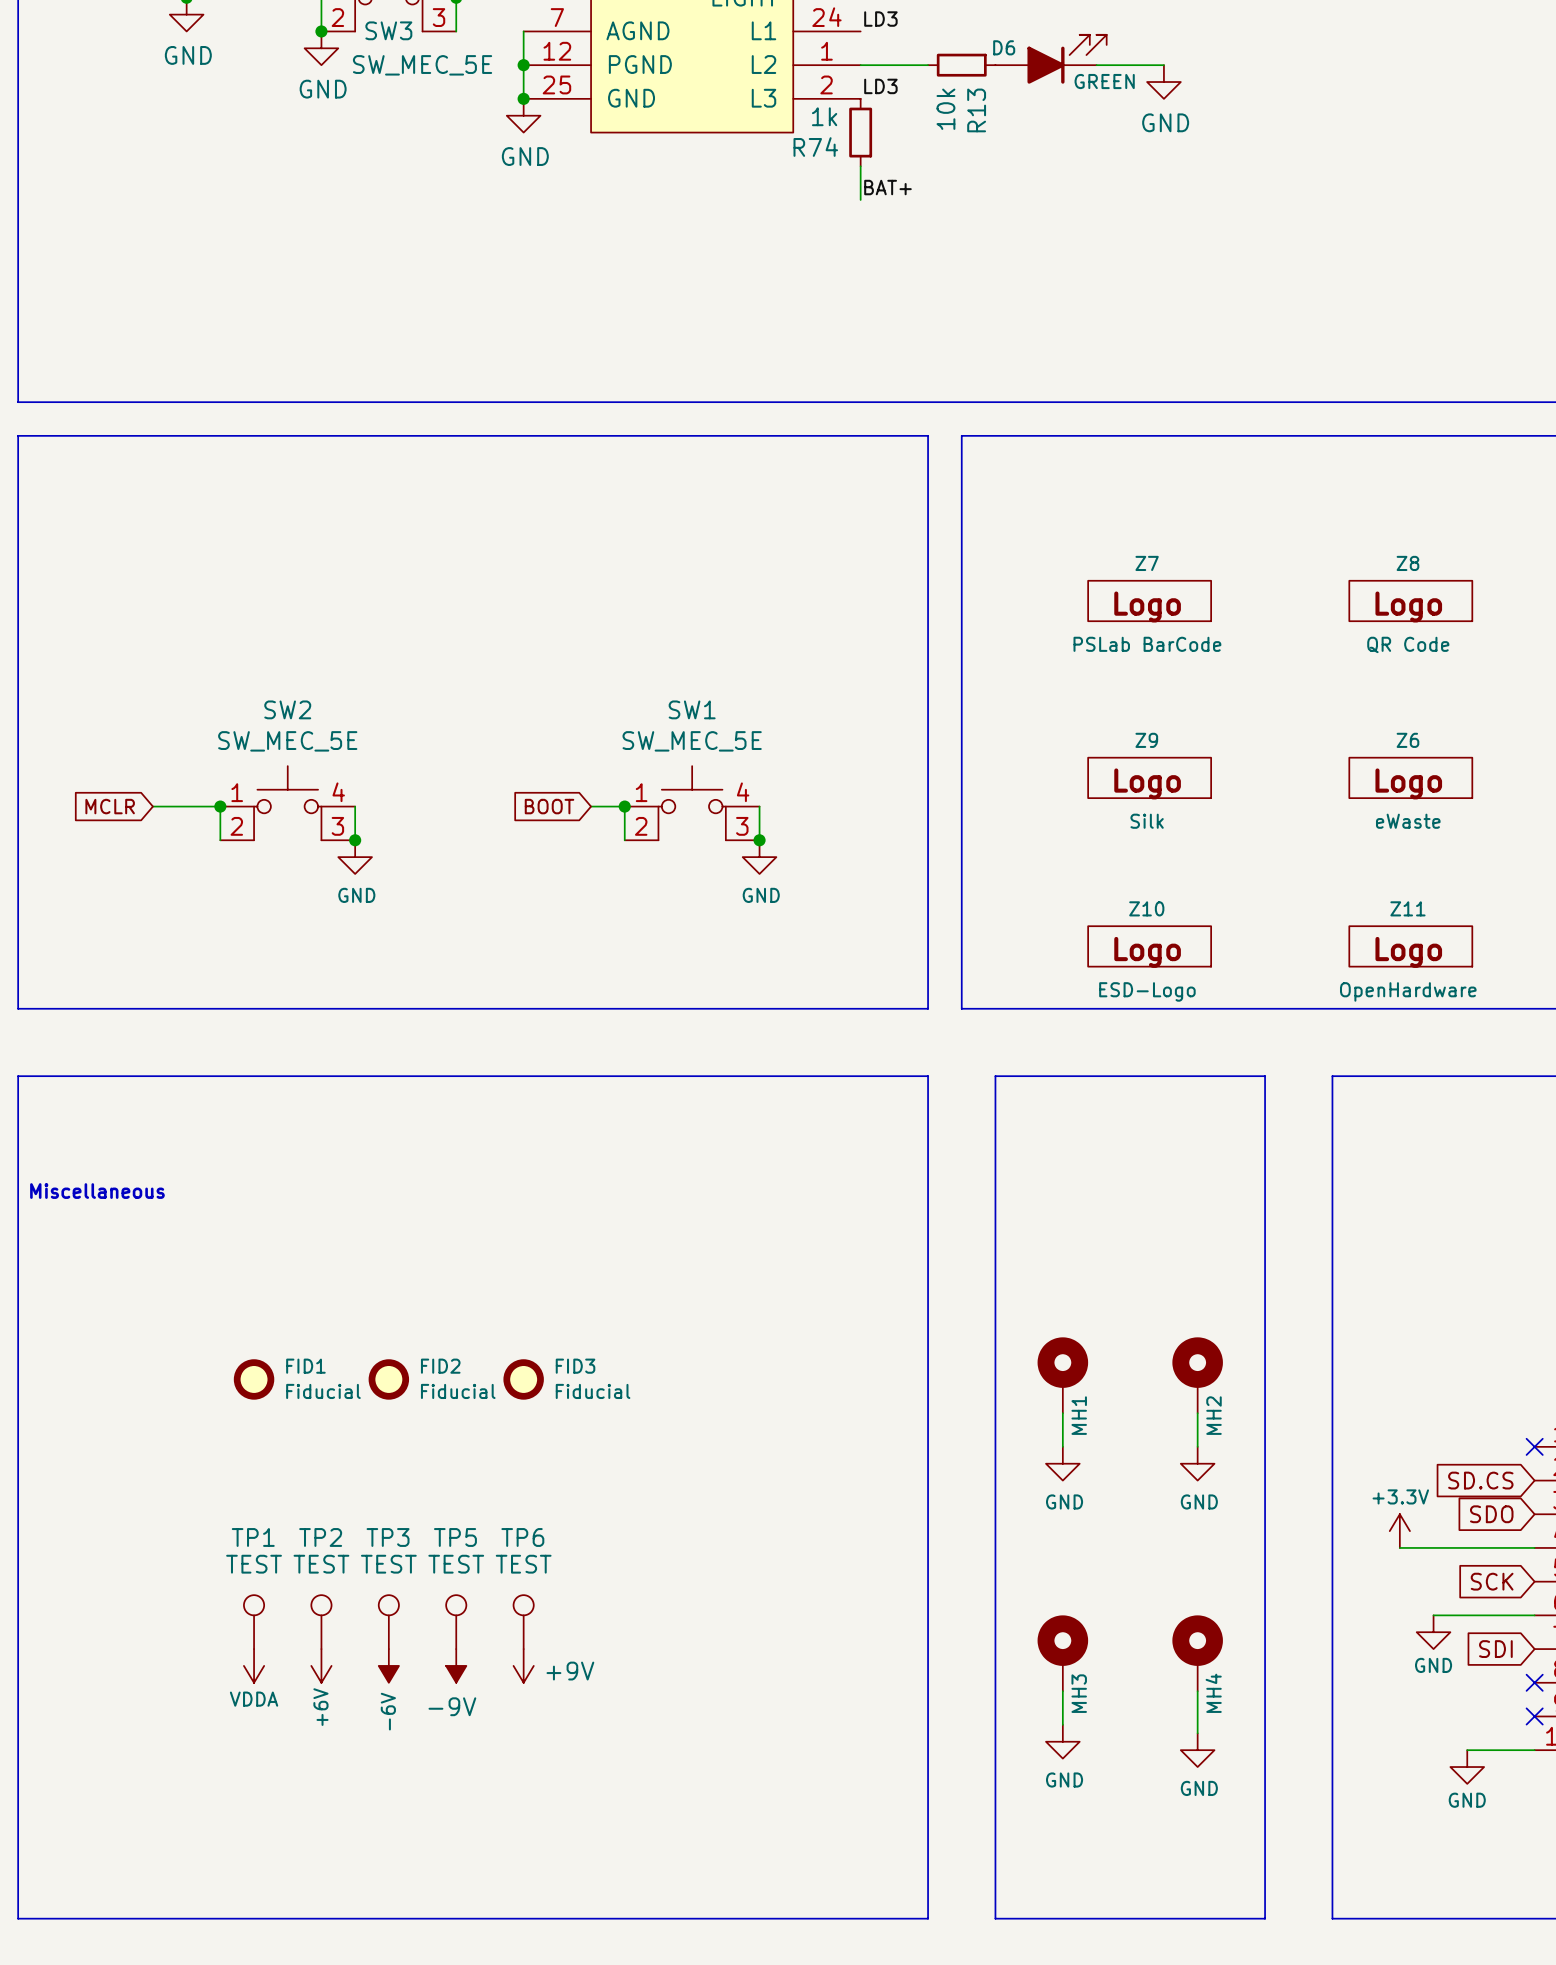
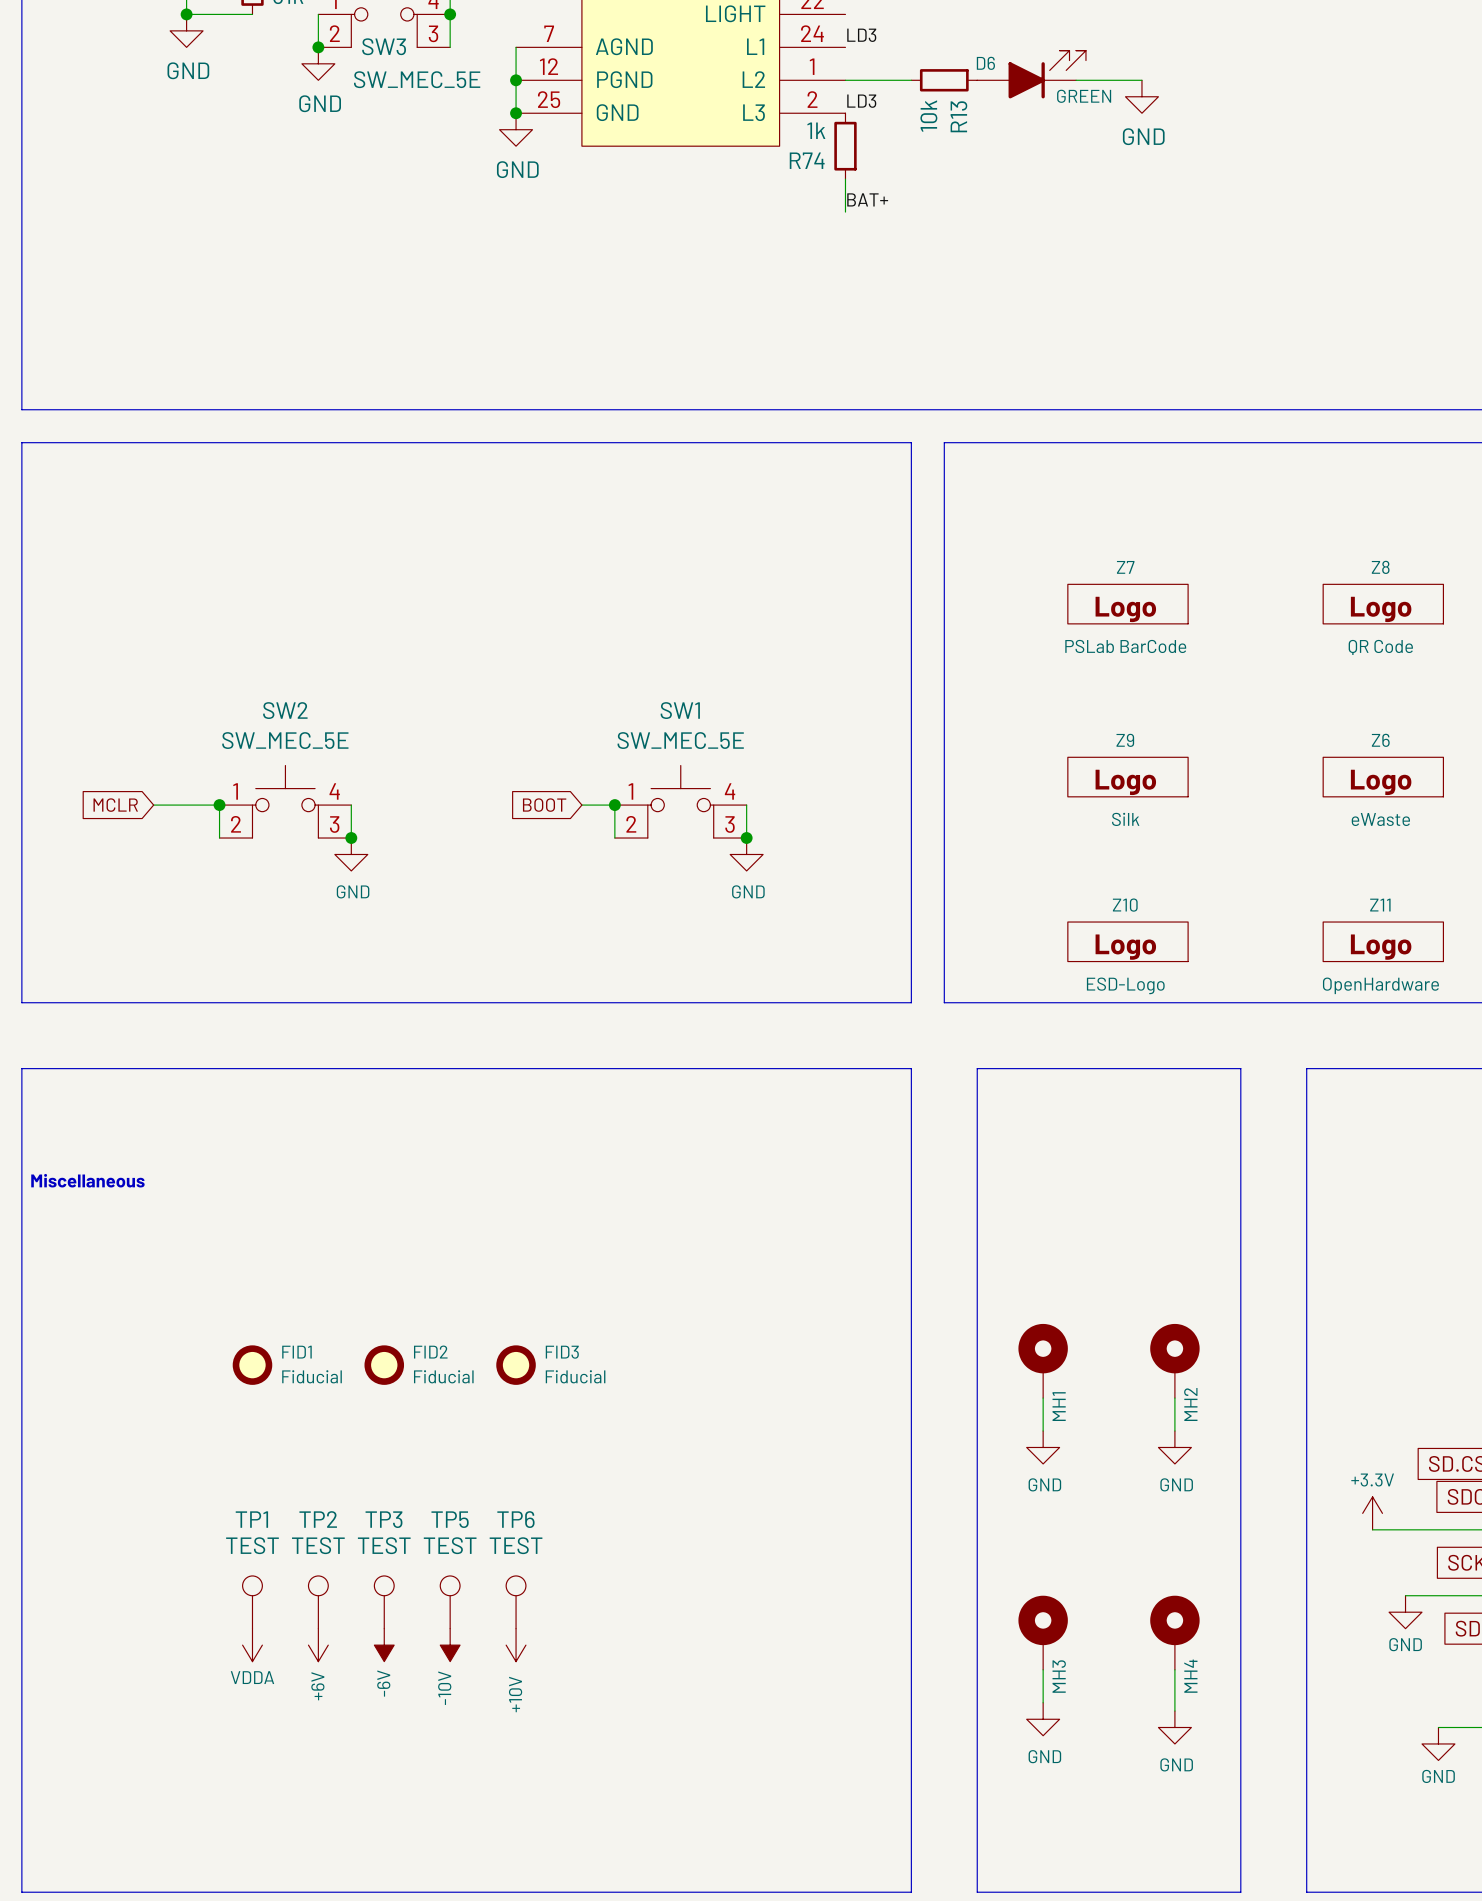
power symbol: -9V (456, 1665) -> -10V (450, 1645)
power symbol: +9V (523, 1665) -> +10V (516, 1645)

